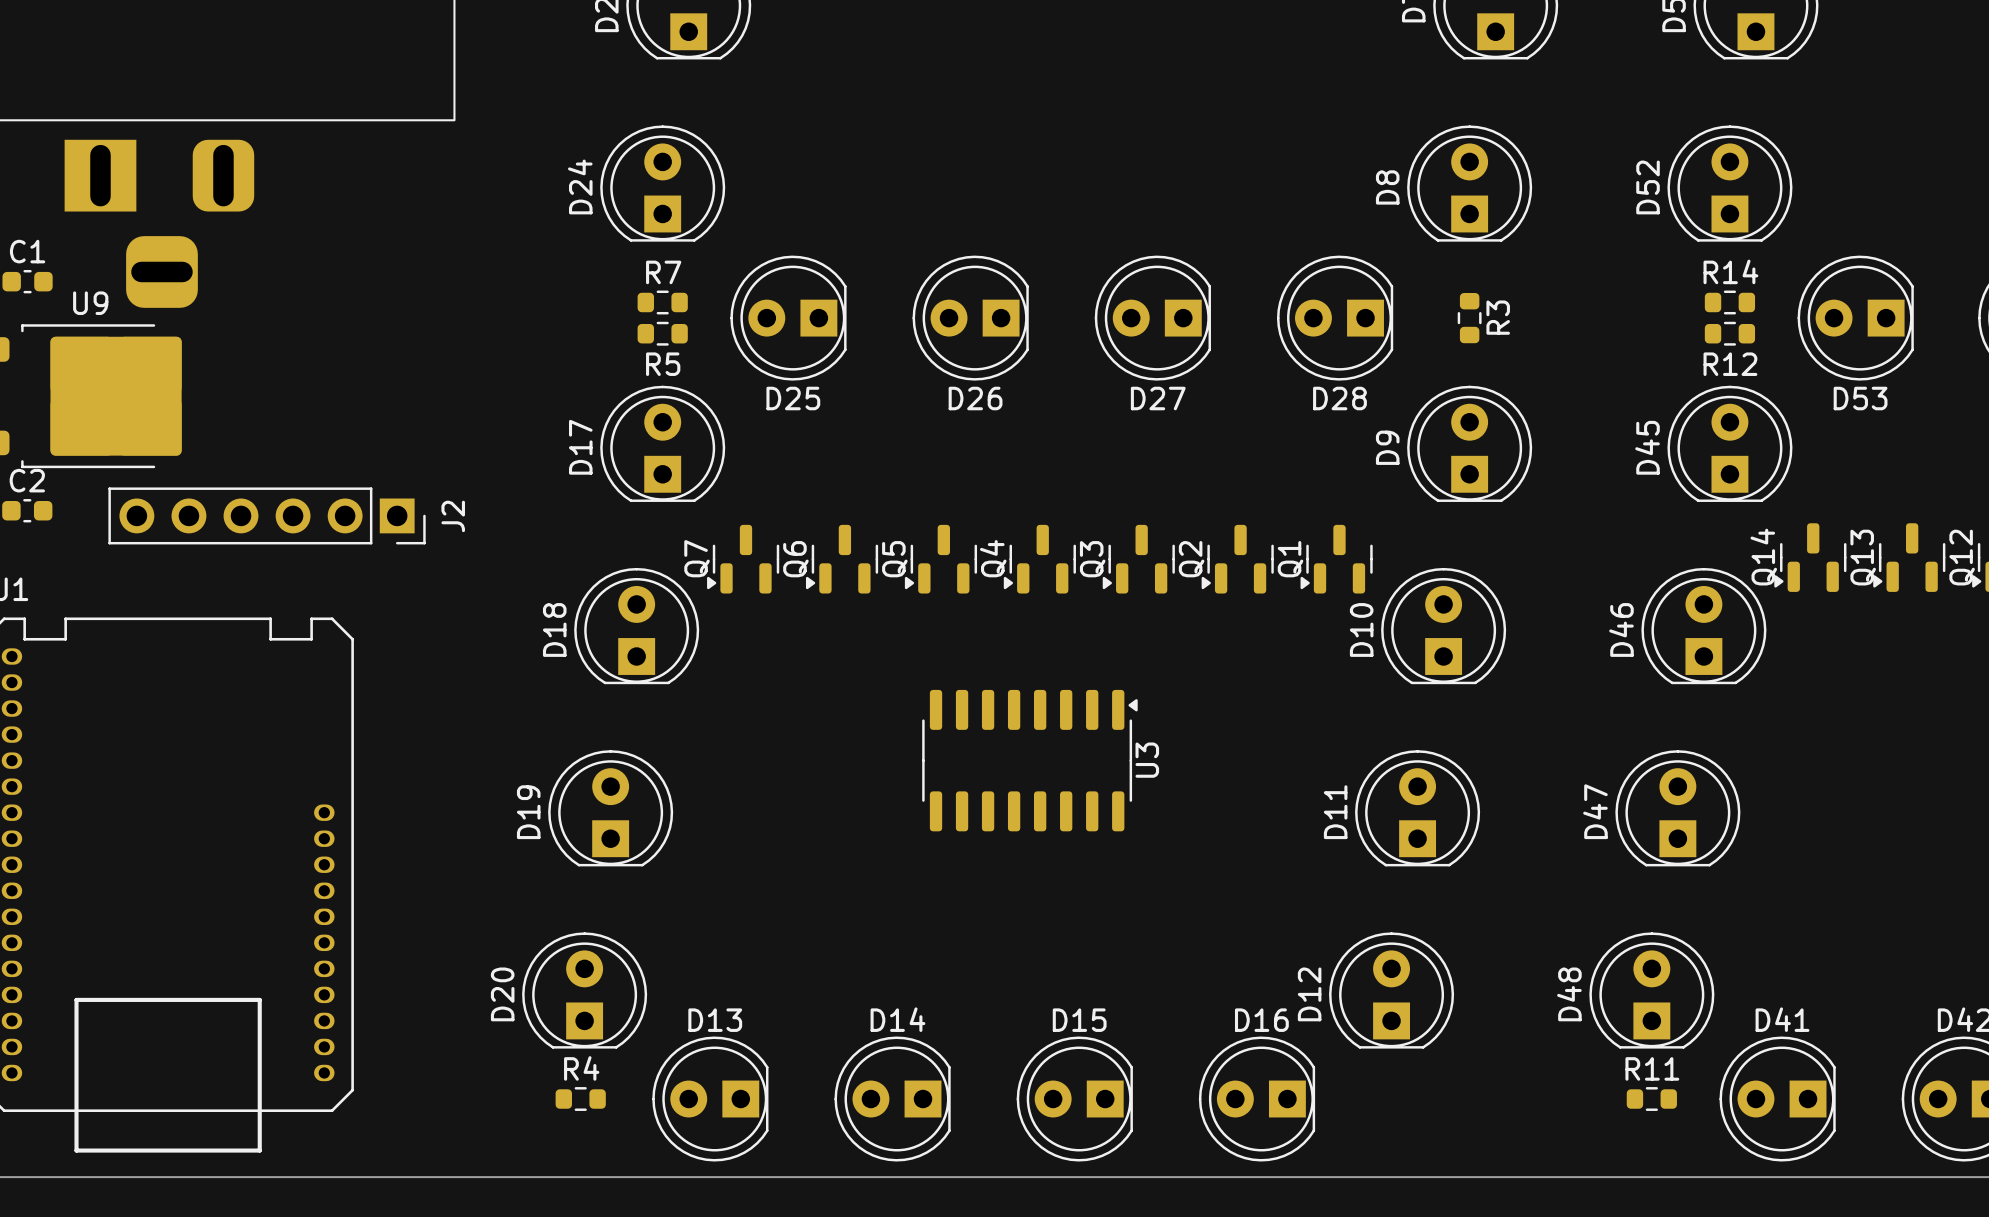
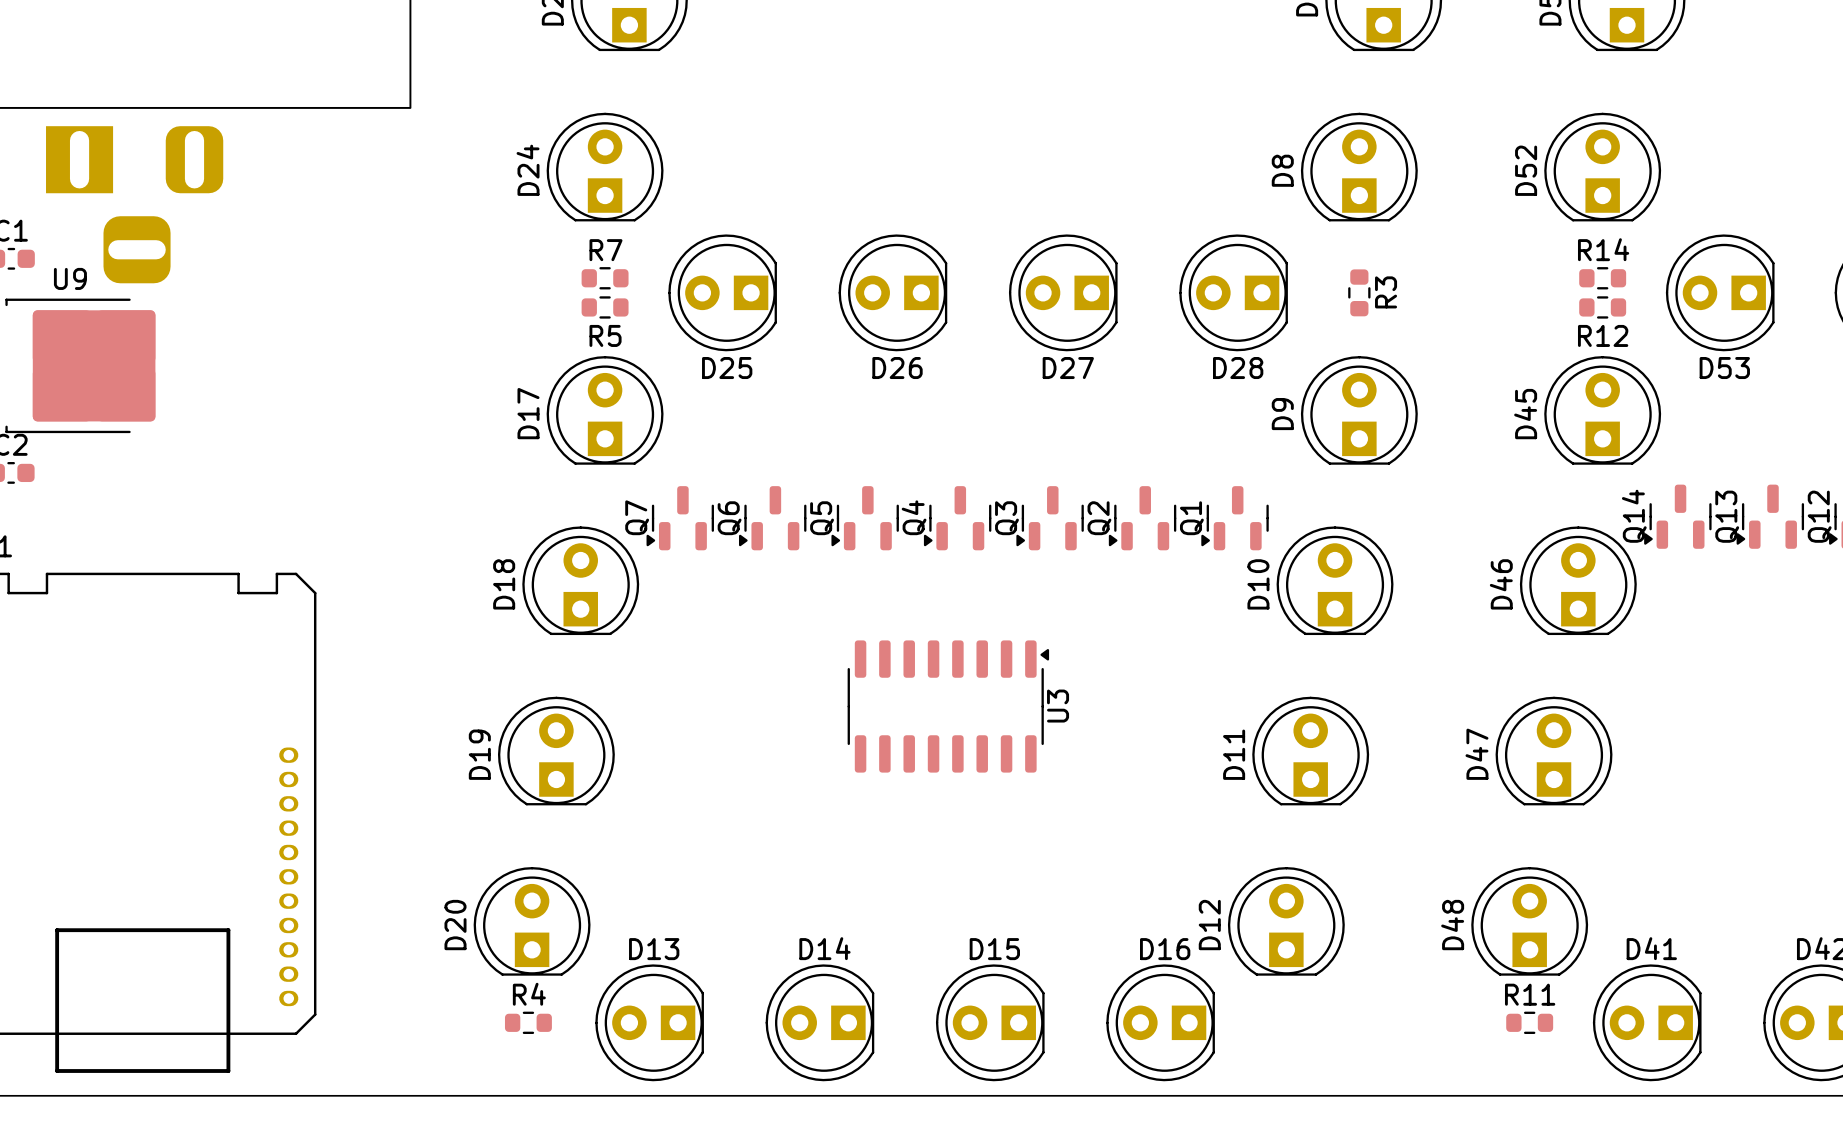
J2: (267, 515) -> none

